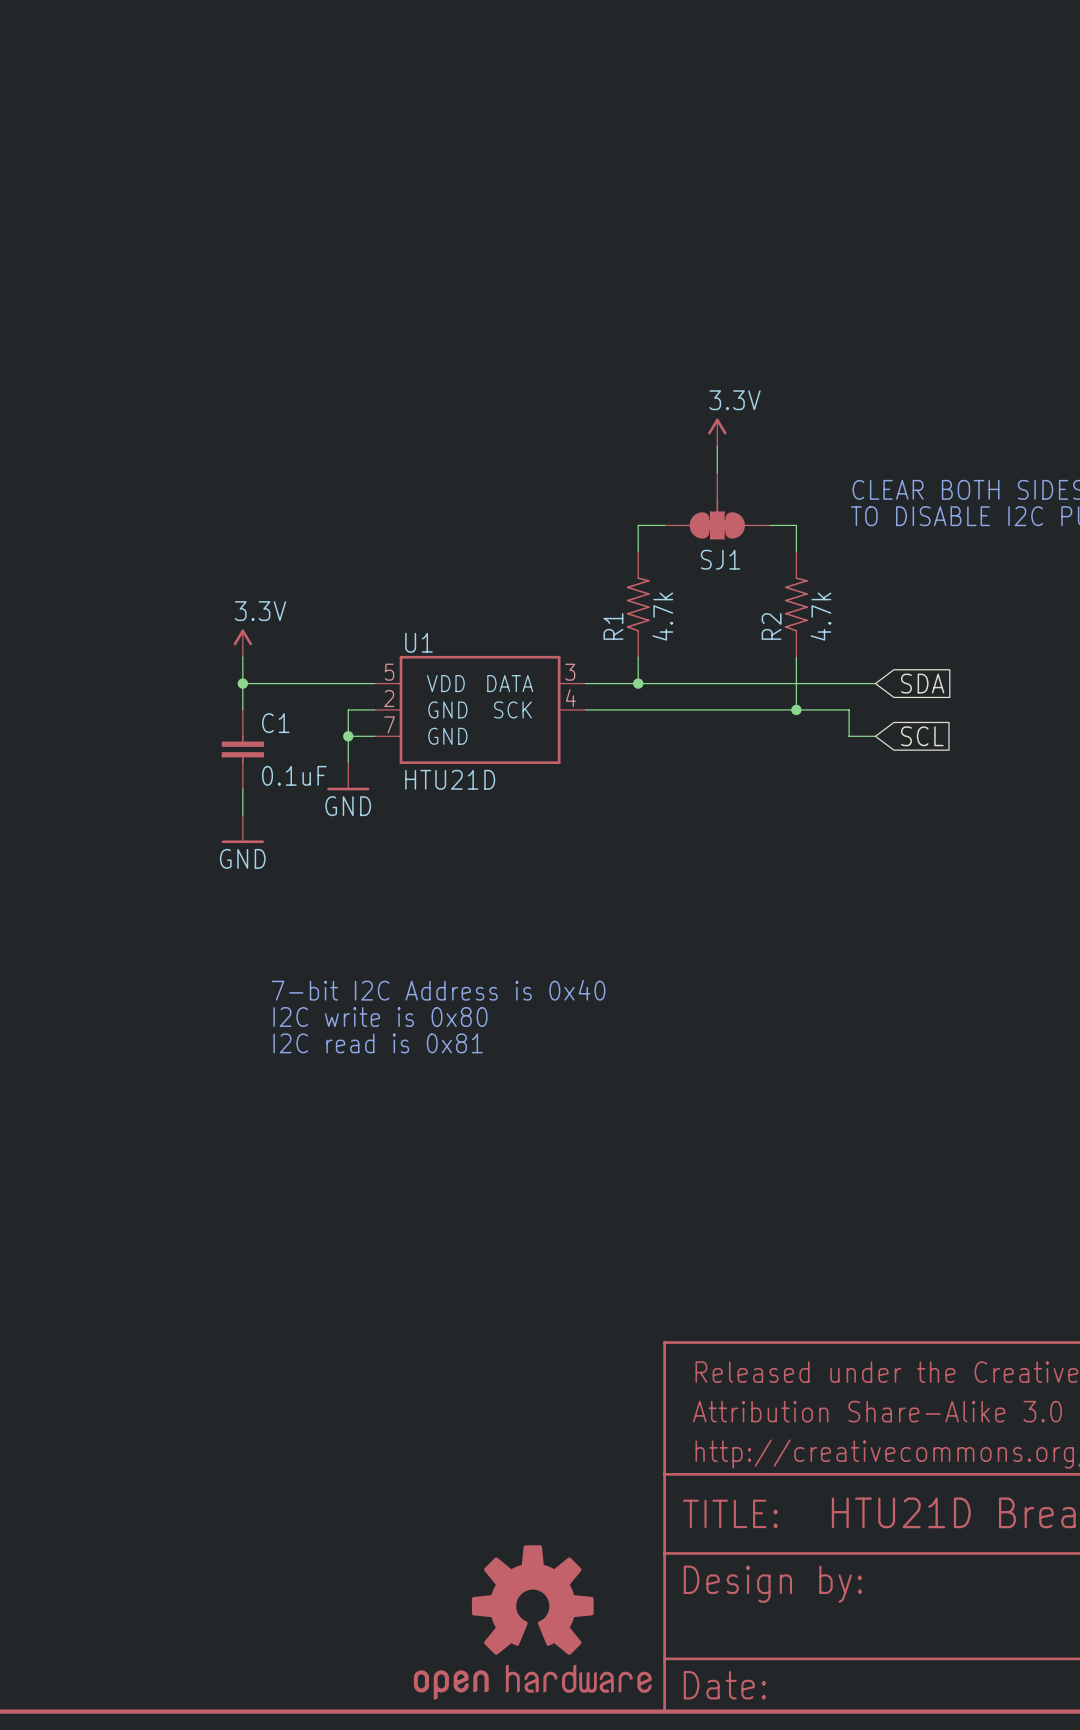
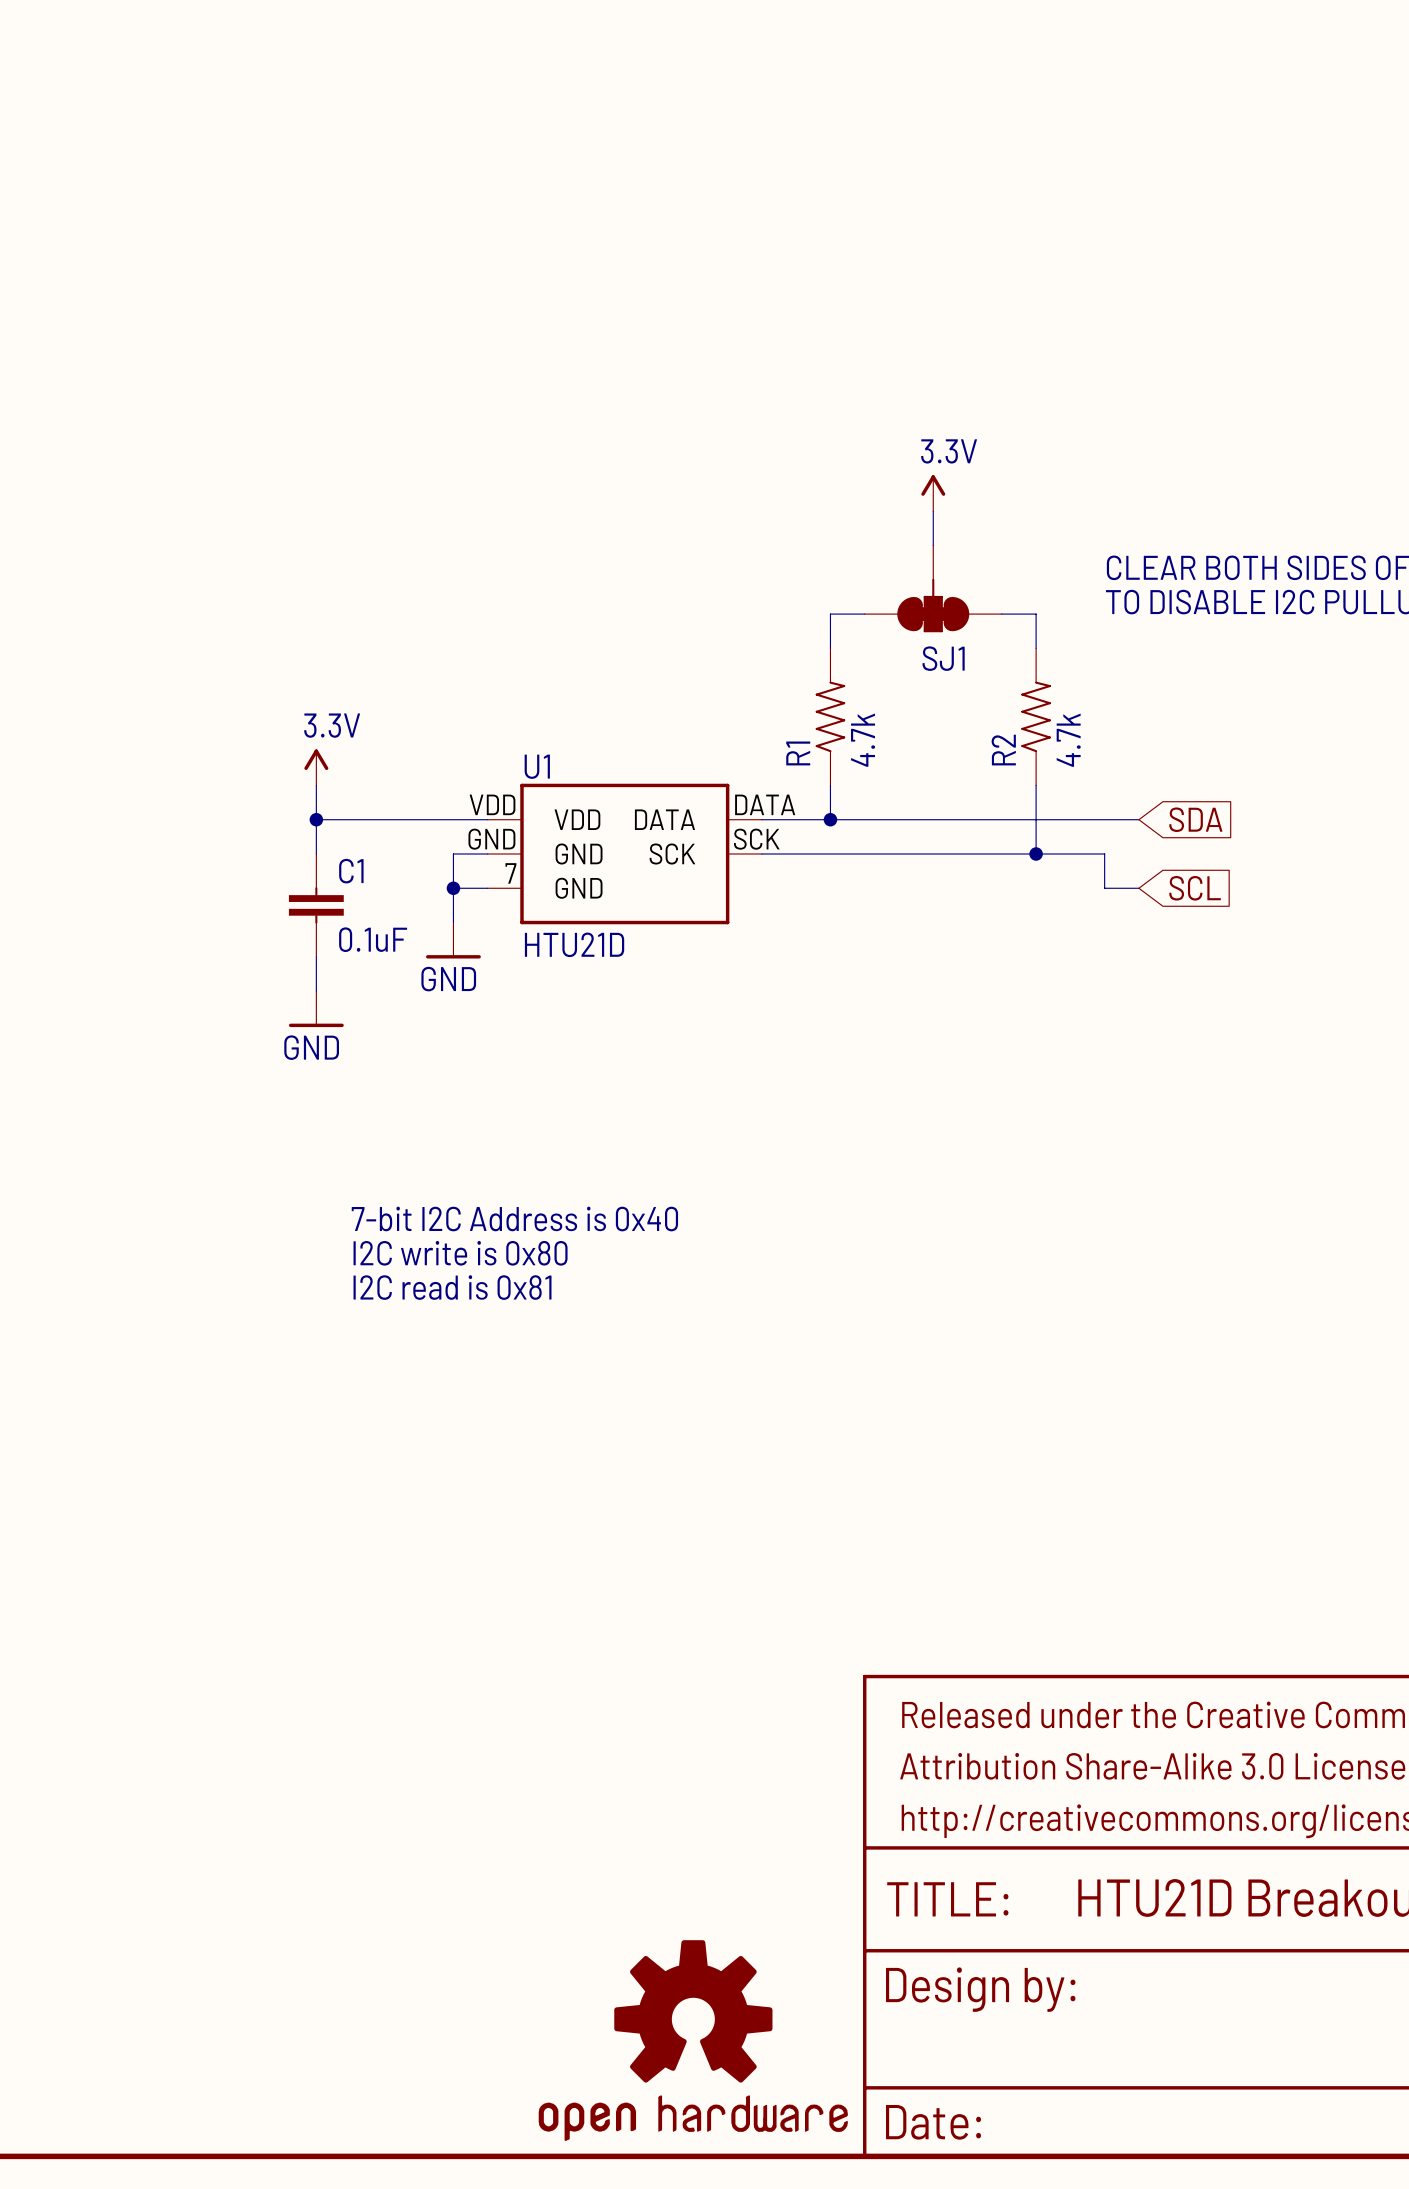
U1 pin number: 5 (389, 672) -> VDD (492, 804)
U1 pin number: 3 (570, 672) -> DATA (765, 804)
U1 pin number: 2 (389, 698) -> GND (491, 839)
U1 pin number: 4 (570, 698) -> SCK (756, 839)

